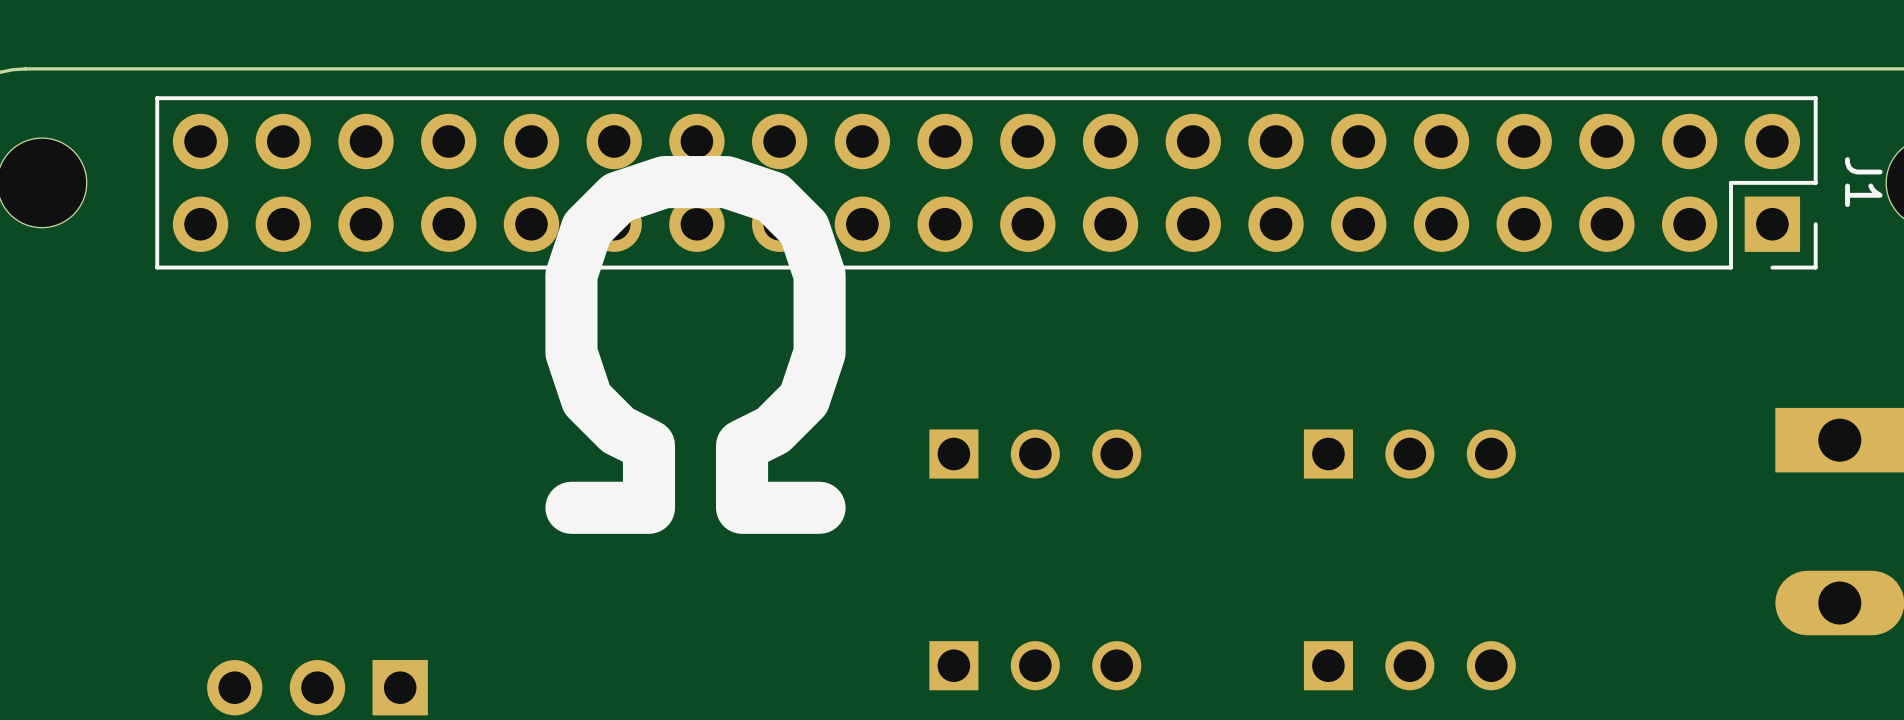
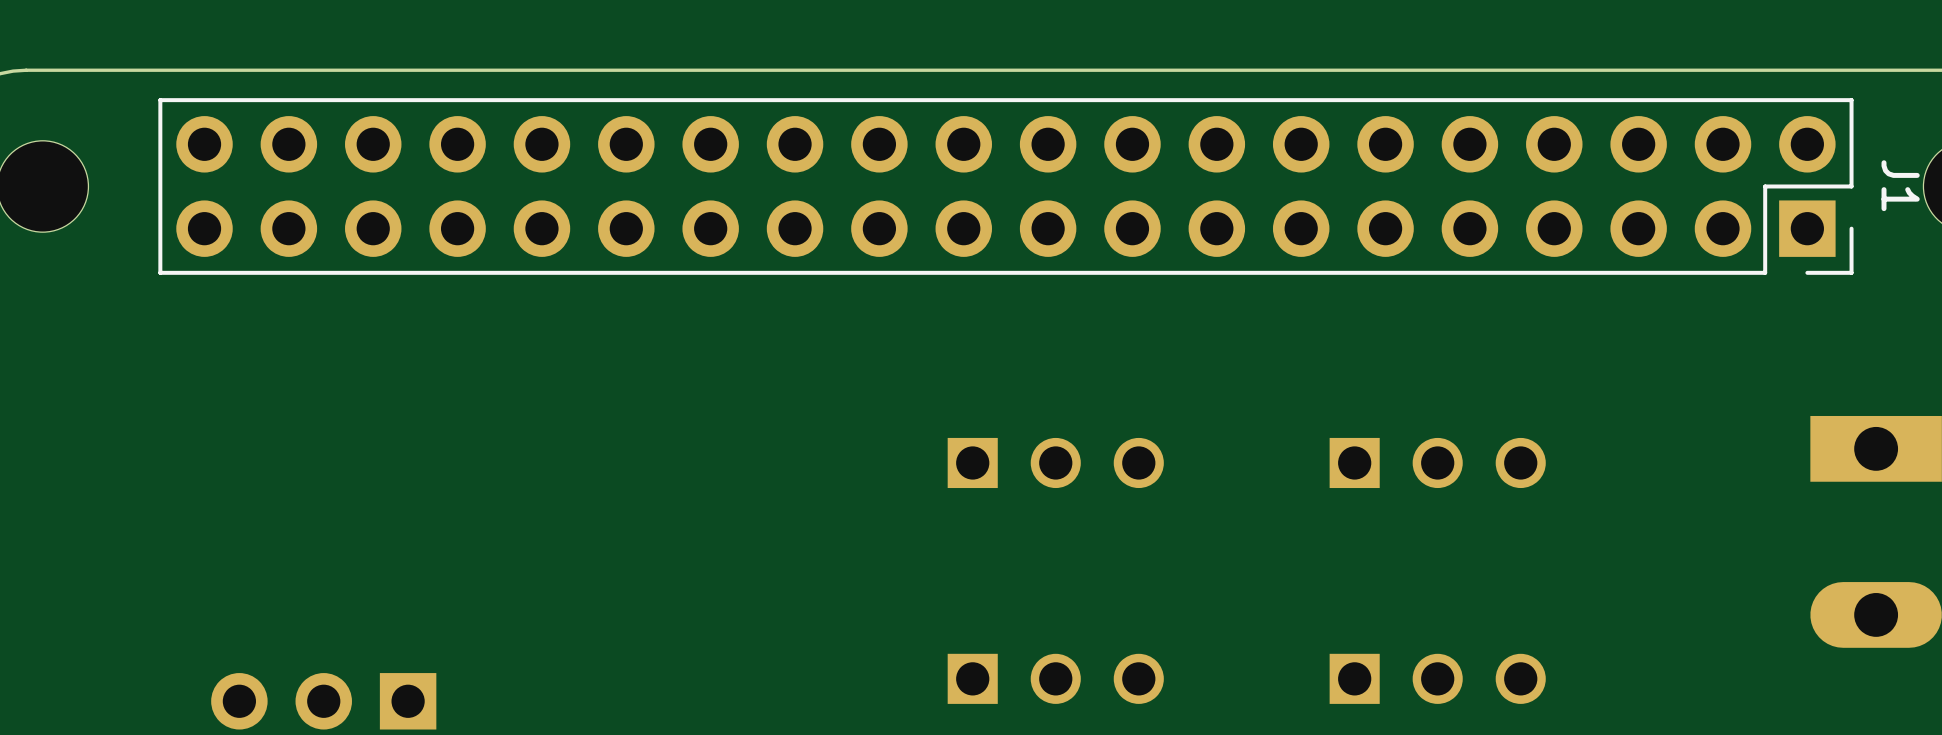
text: Ω (695, 344) -> none

